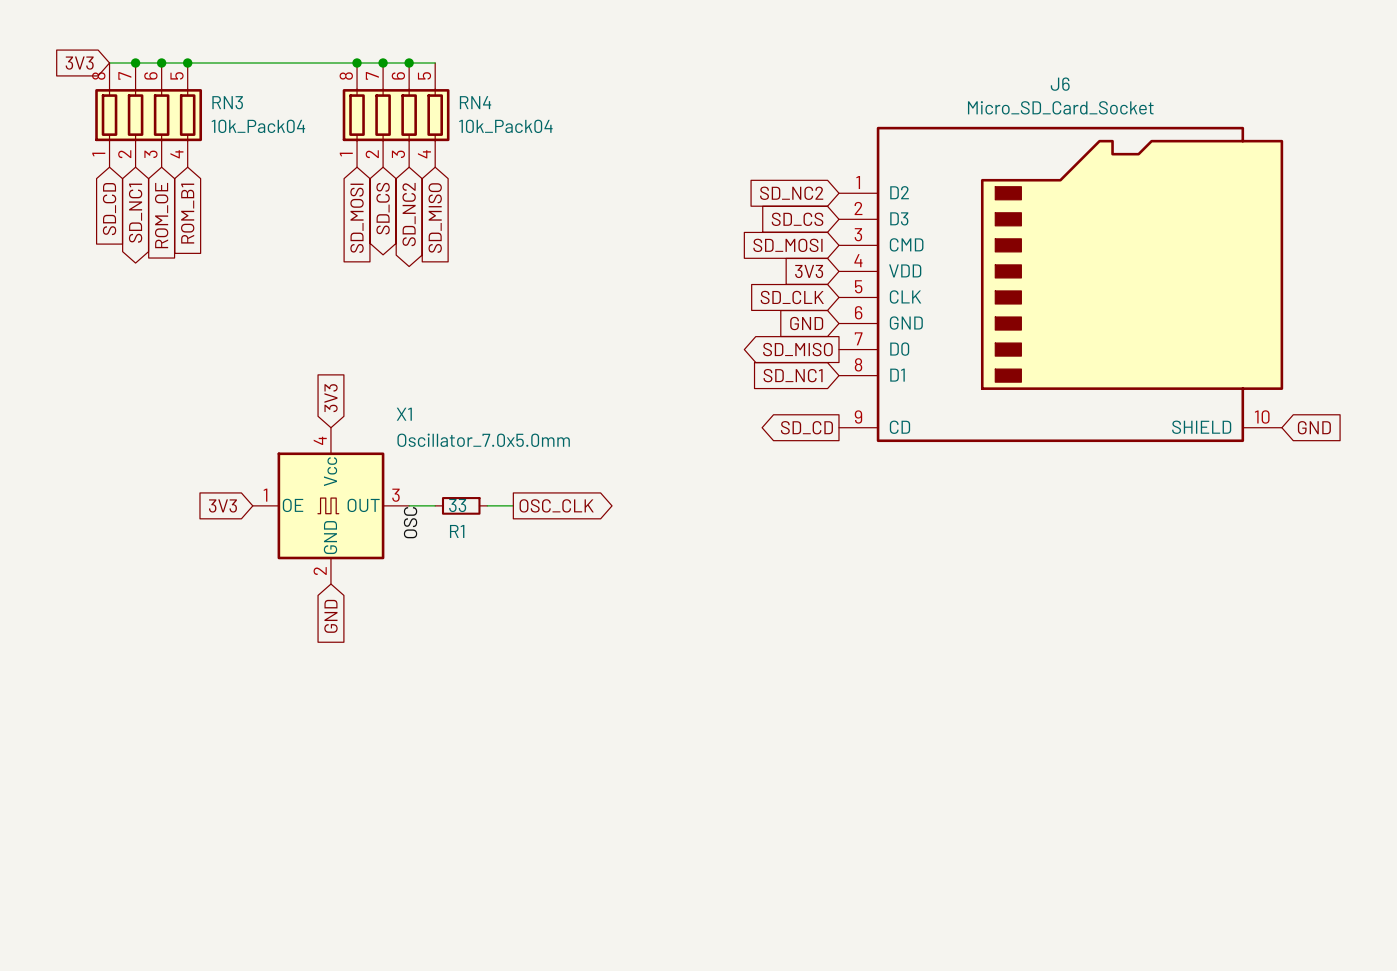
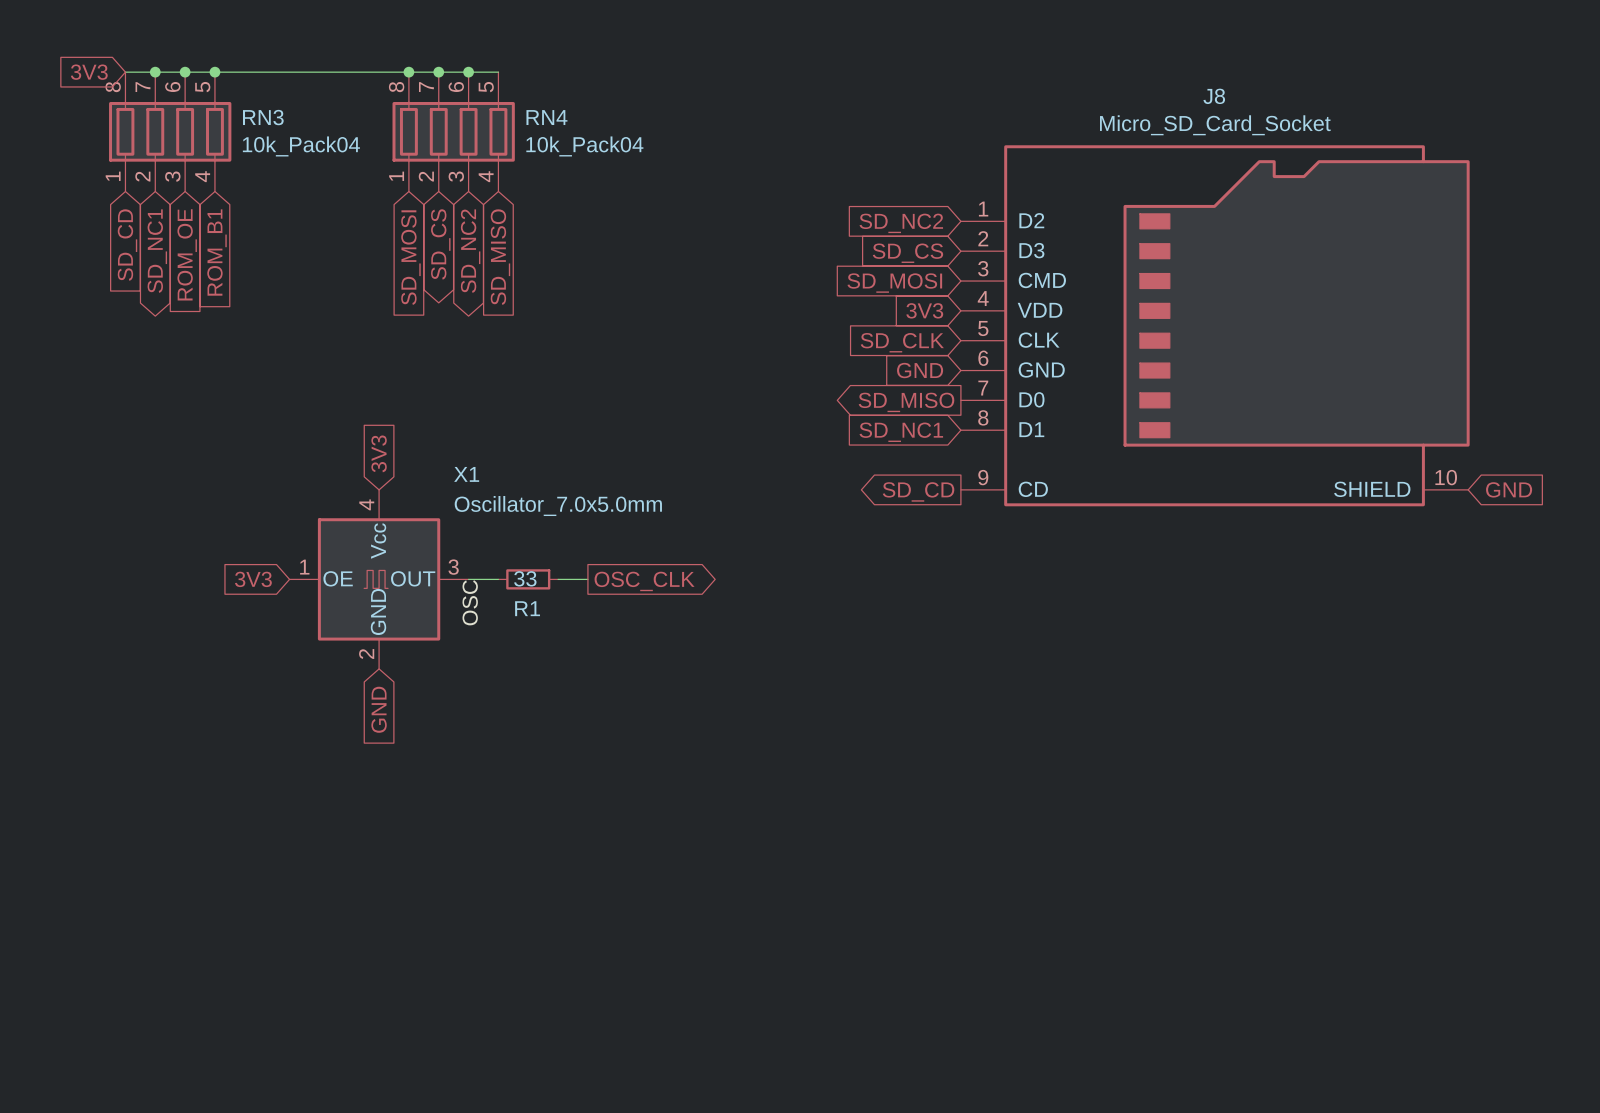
J6 name: J6 (1060, 84) -> J8 (1214, 96)

